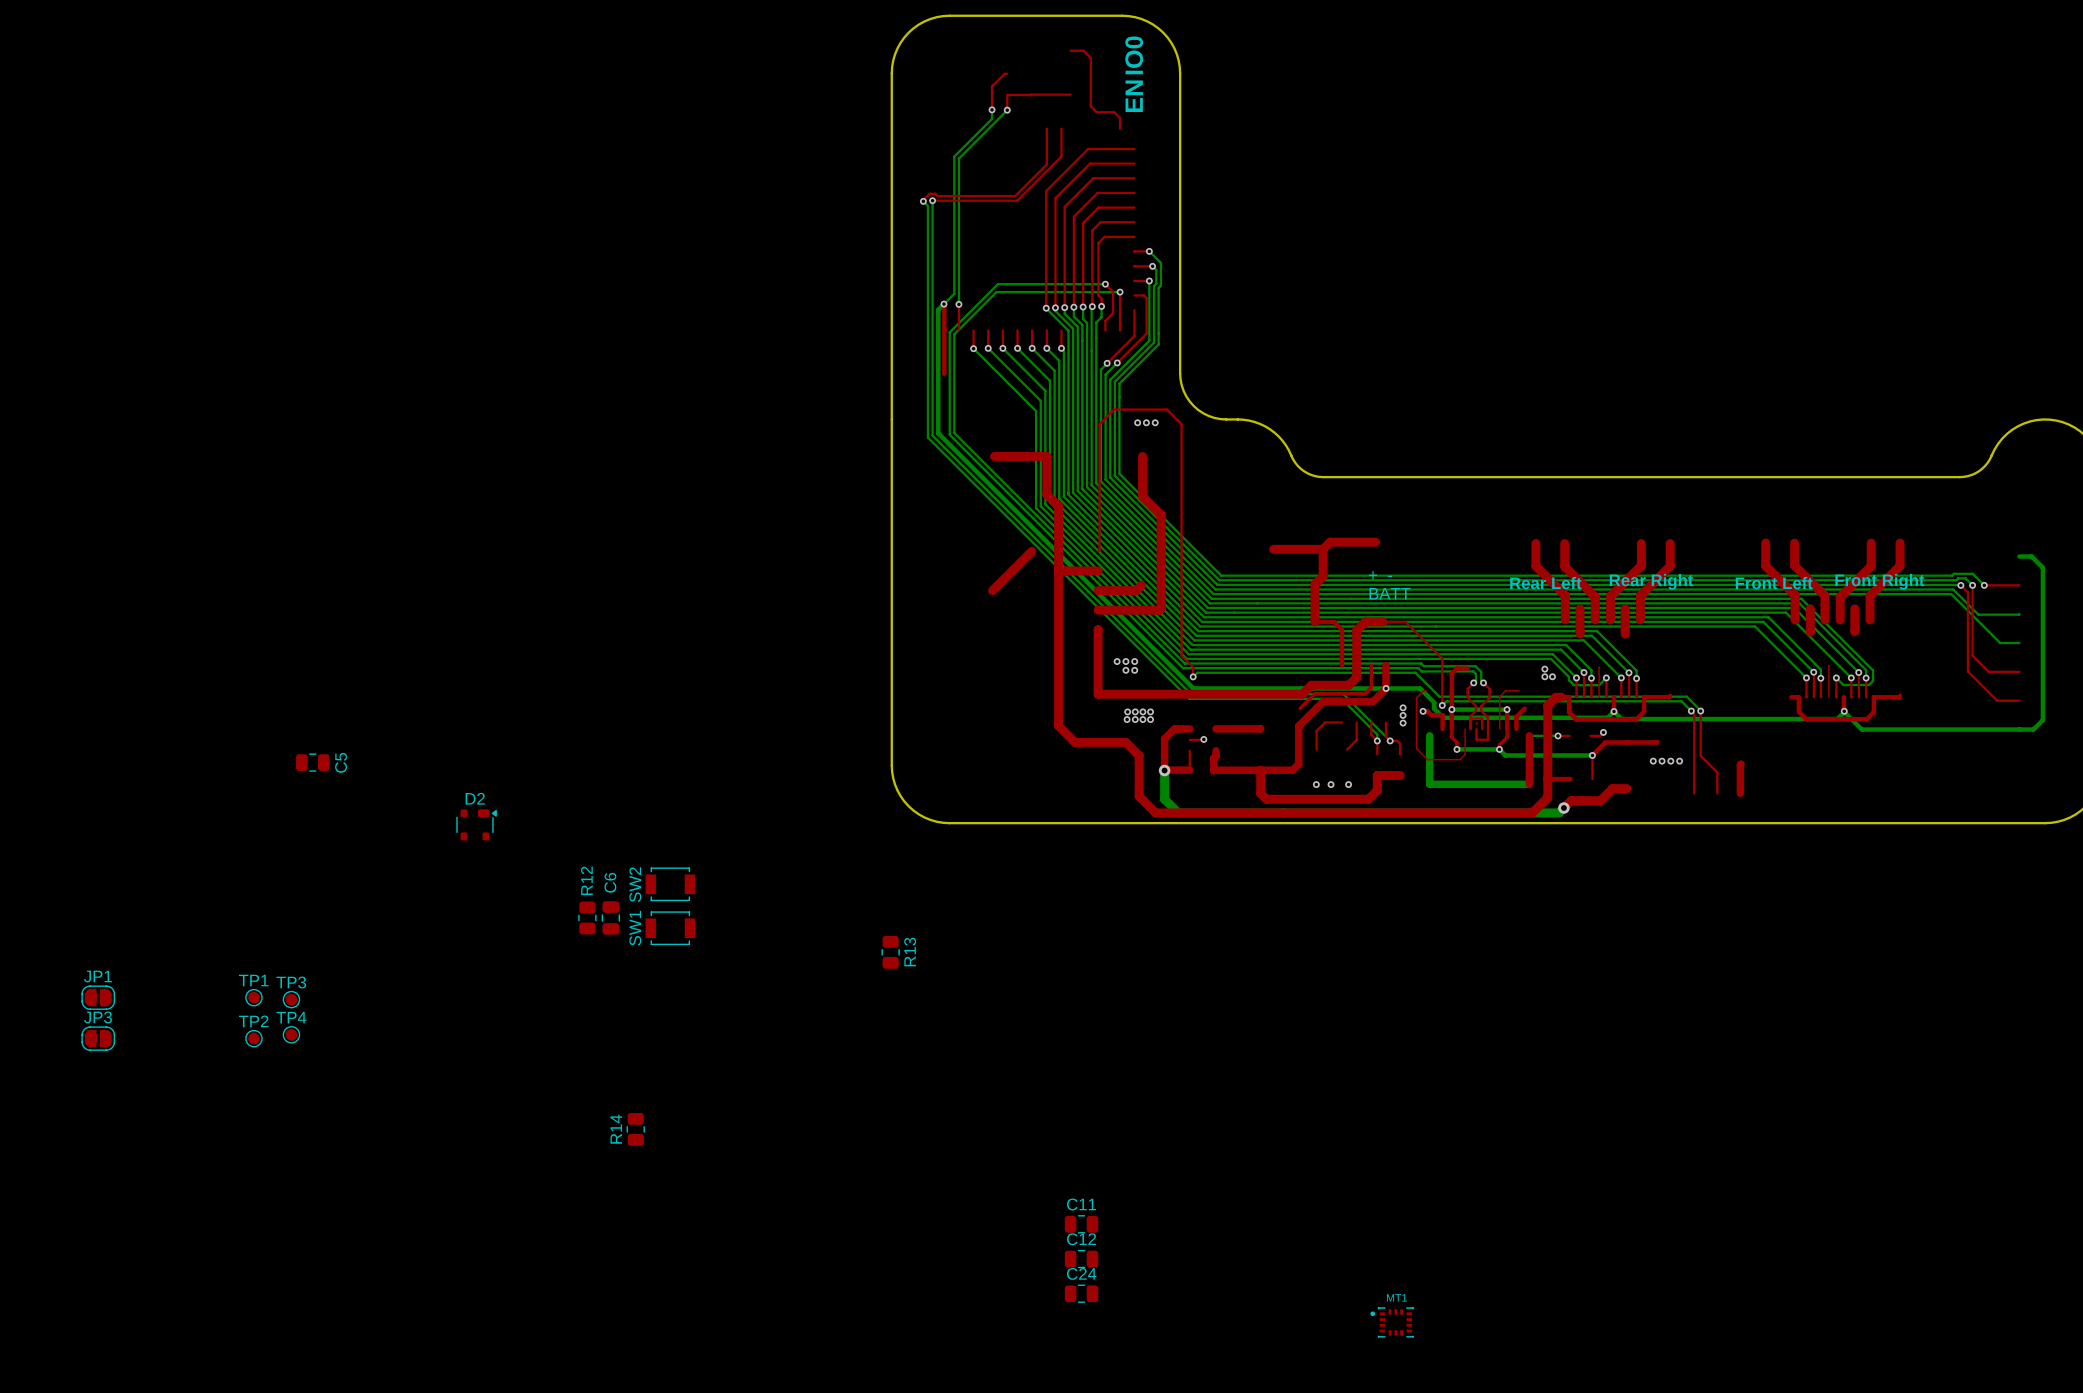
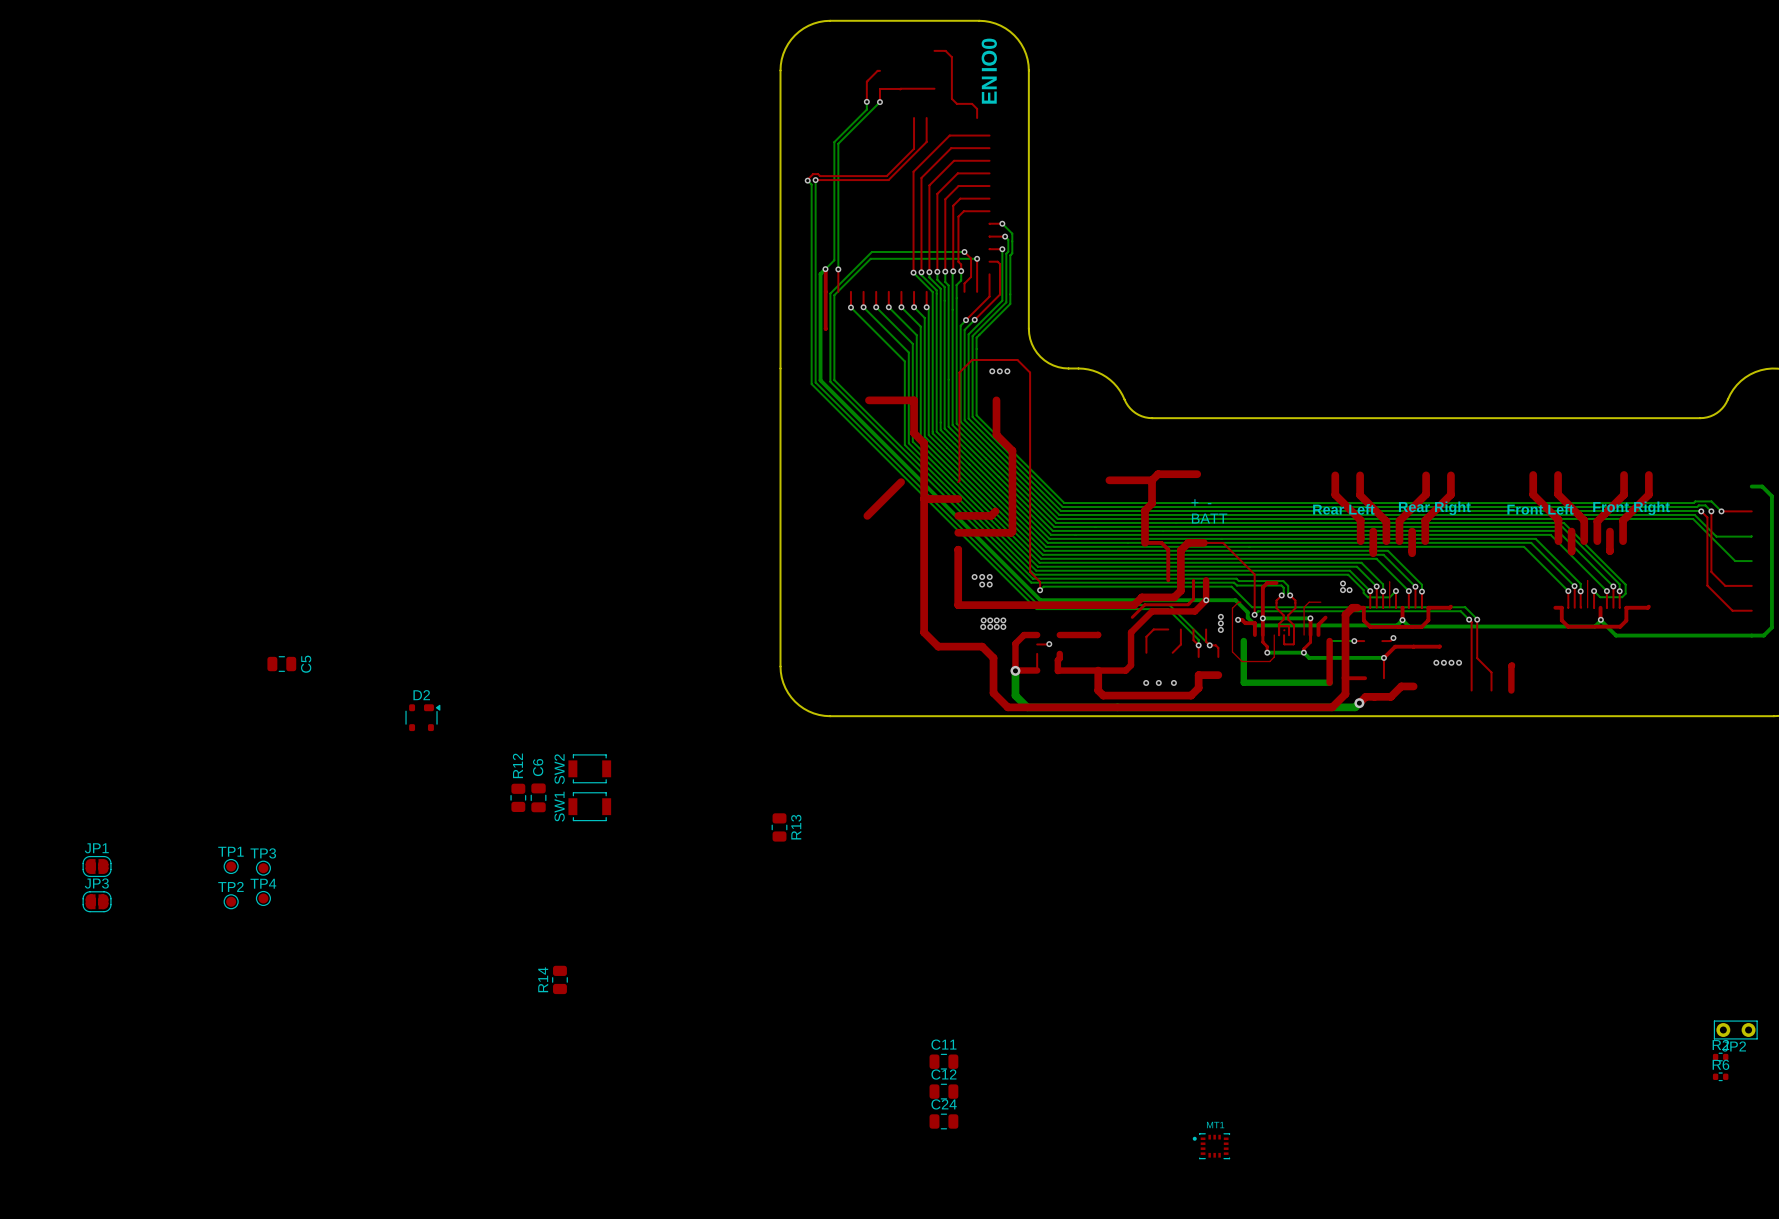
JP2: none -> (1735, 1030)
R2: none -> (1720, 1057)
R6: none -> (1720, 1076)

